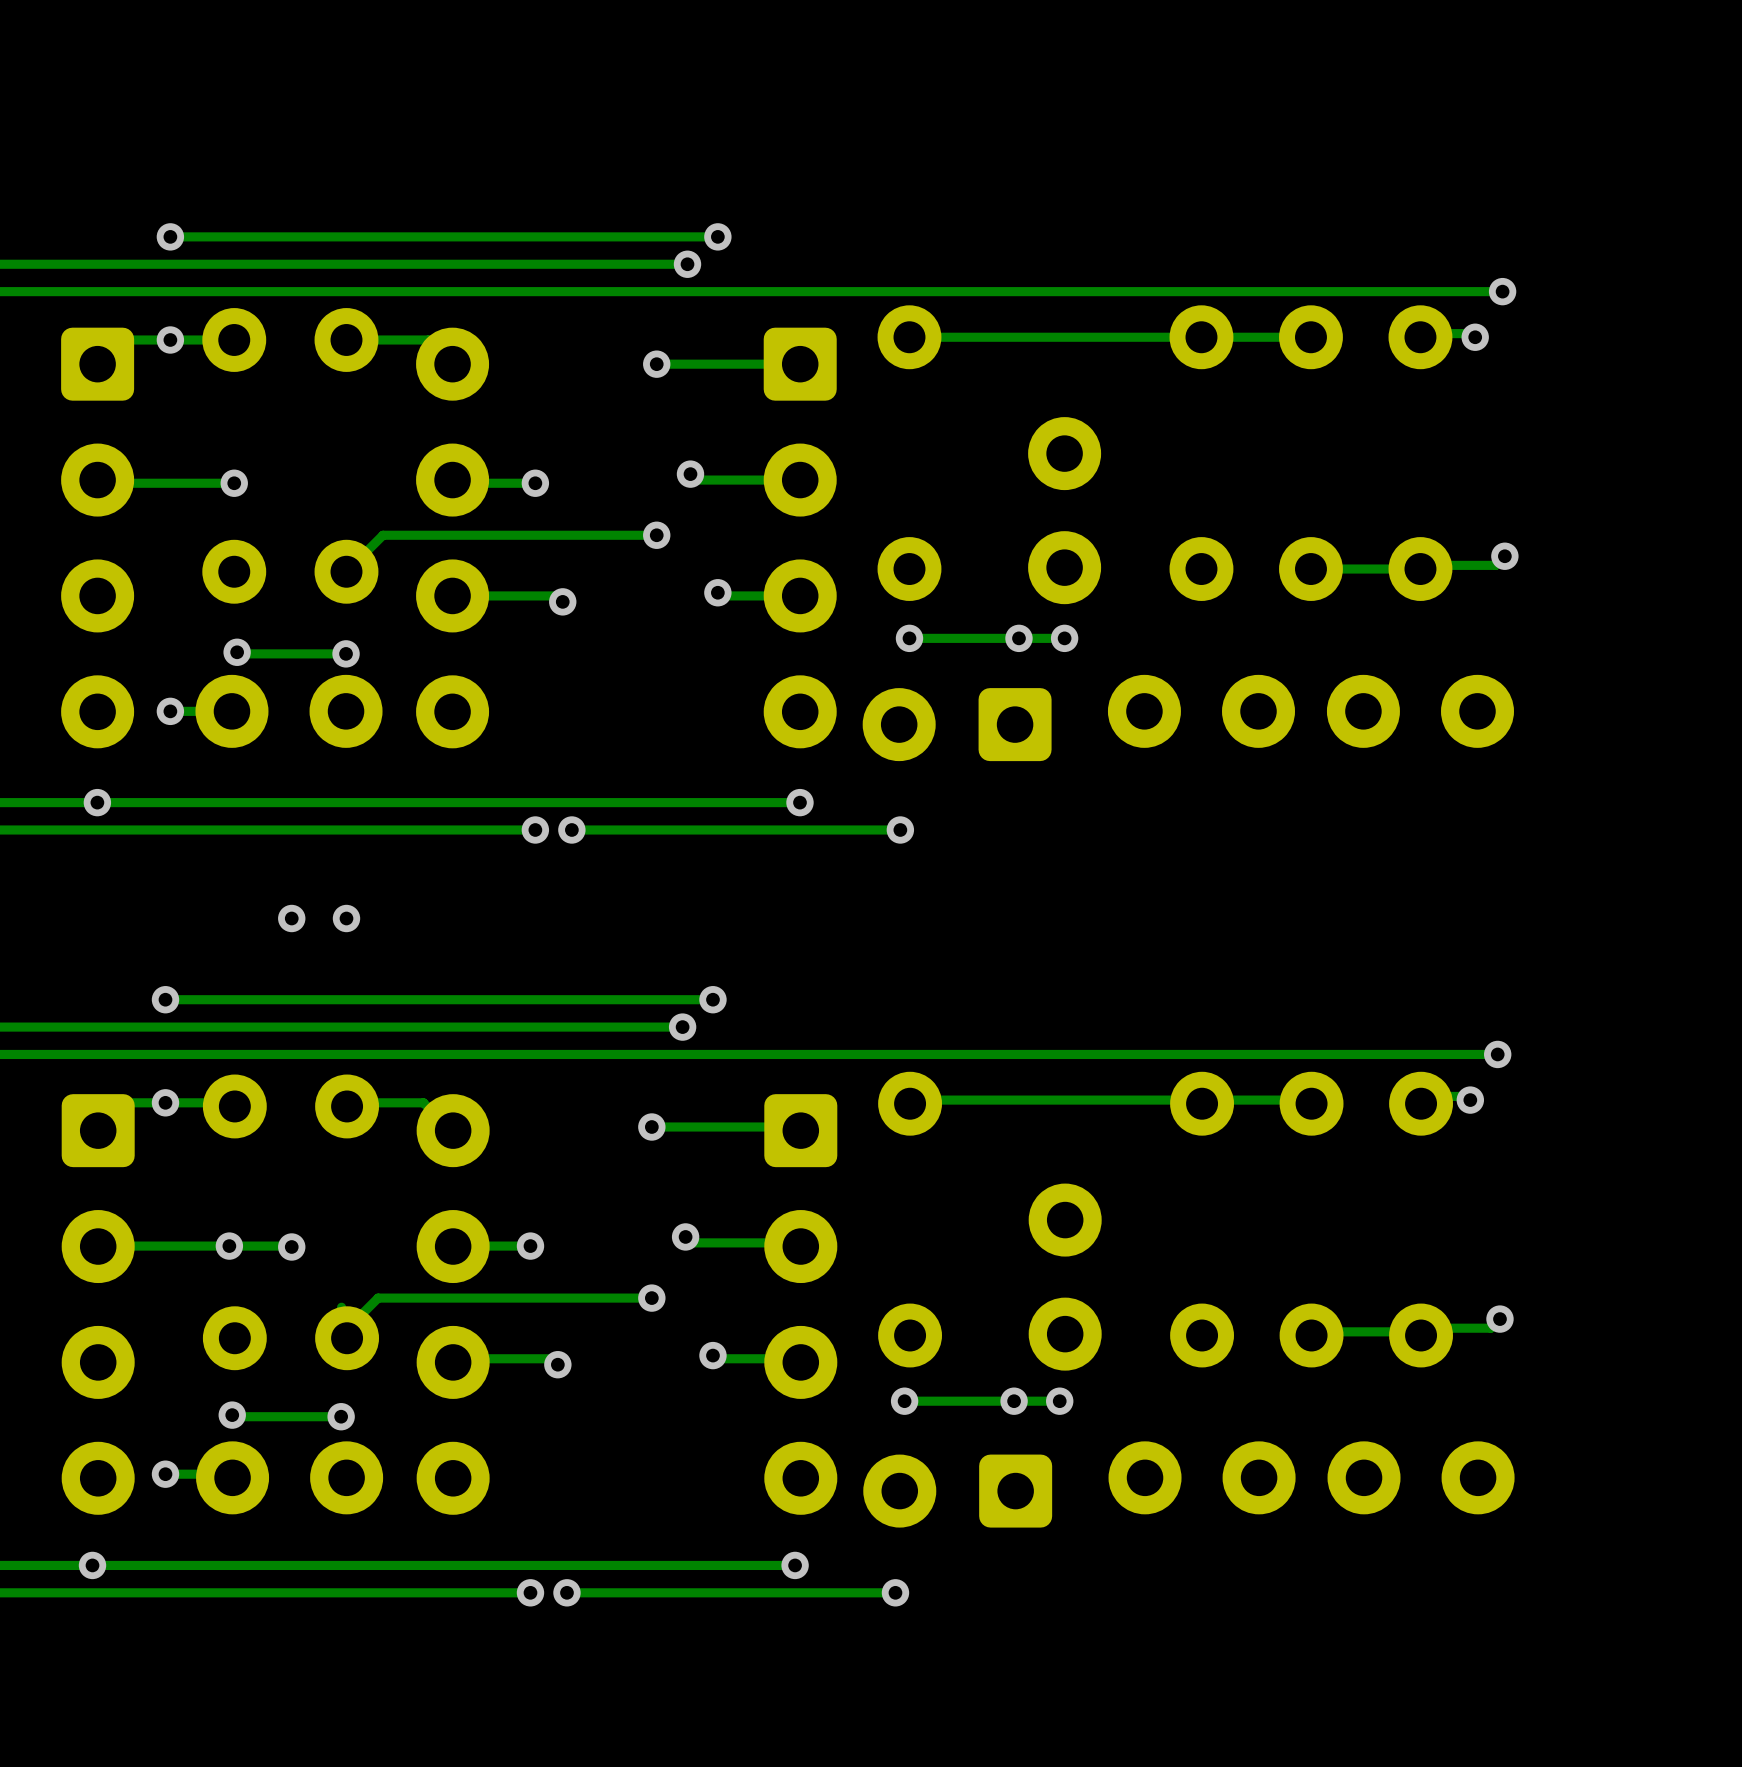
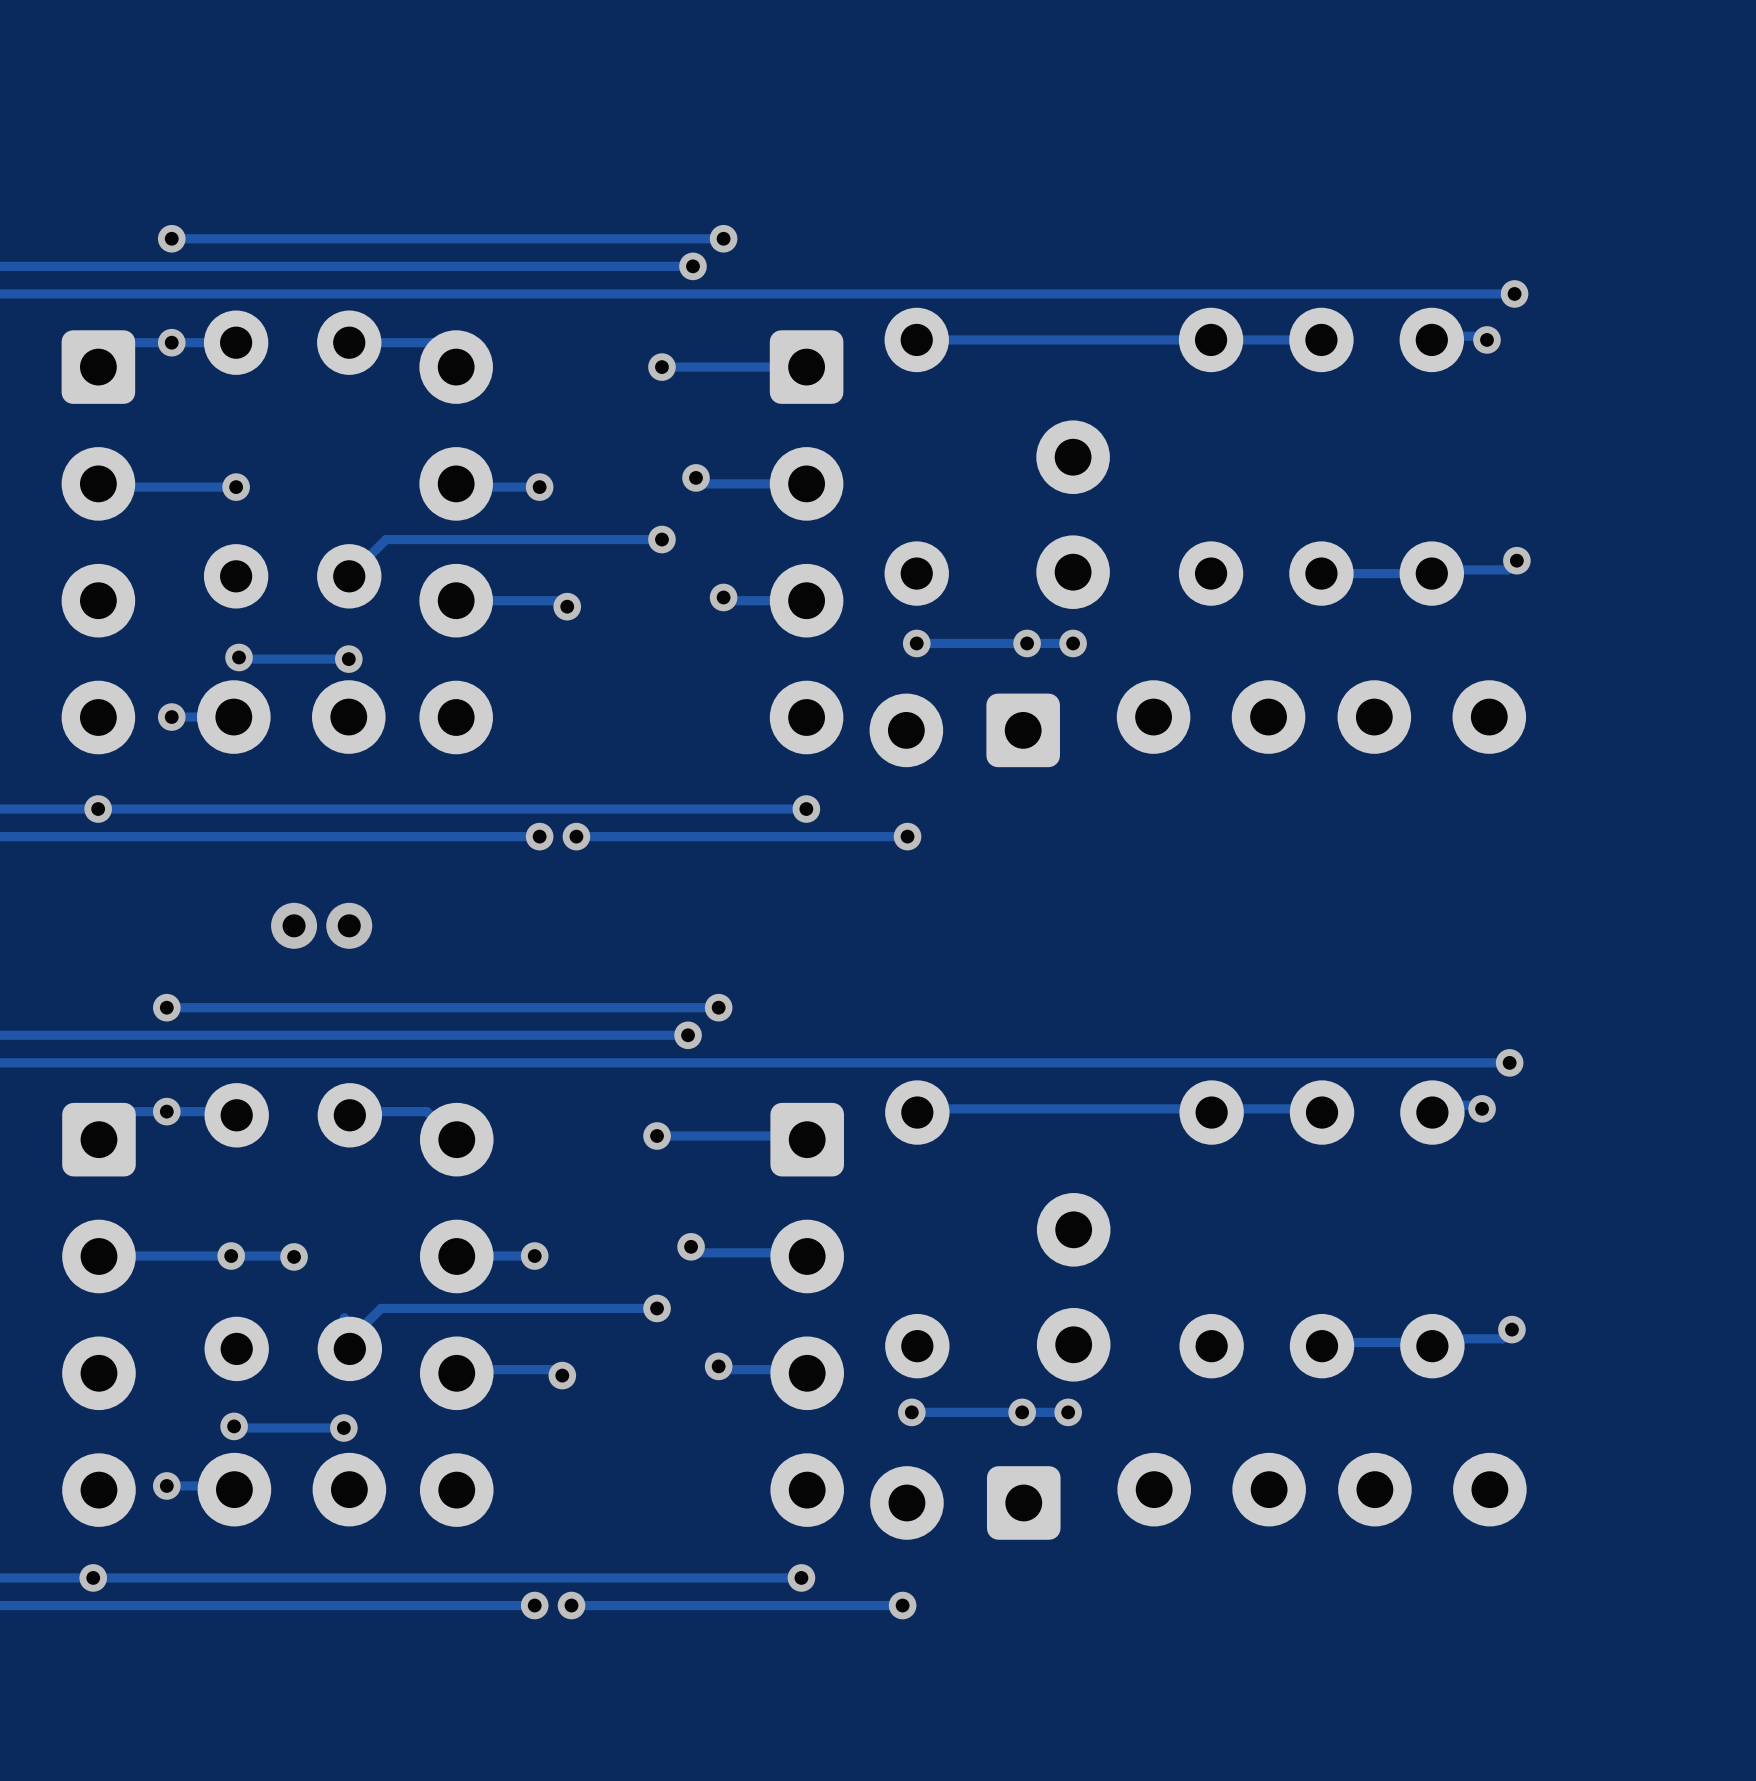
via size: [278, 904, 306, 933] -> [271, 902, 318, 949]
via size: [332, 904, 361, 933] -> [326, 902, 373, 949]

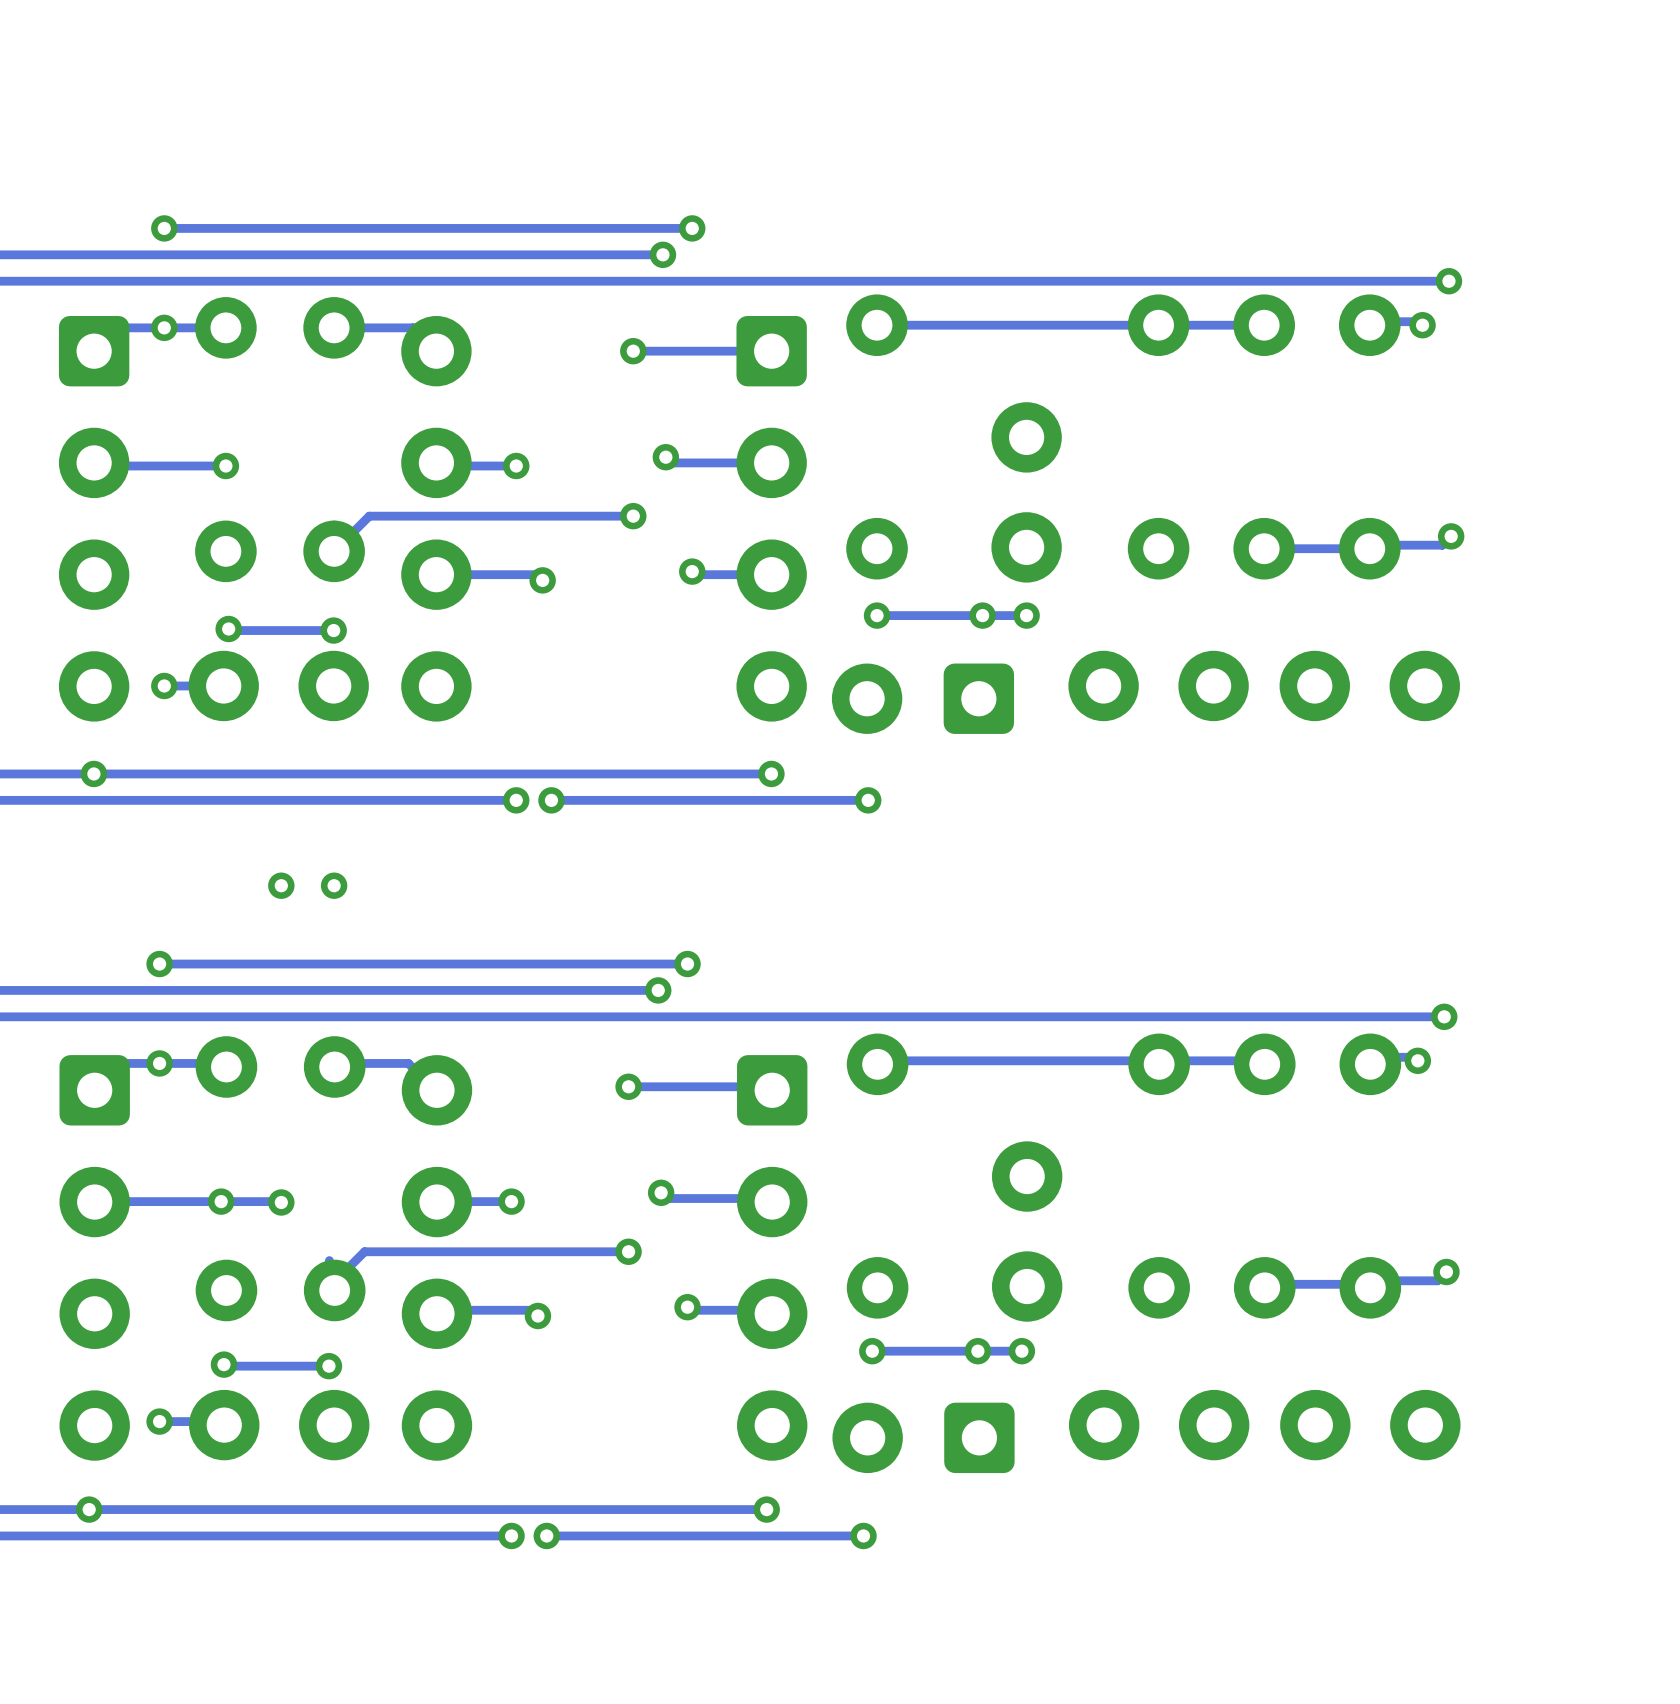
via size: [271, 902, 318, 949] -> [268, 872, 295, 899]
via size: [326, 902, 373, 949] -> [320, 872, 348, 899]

